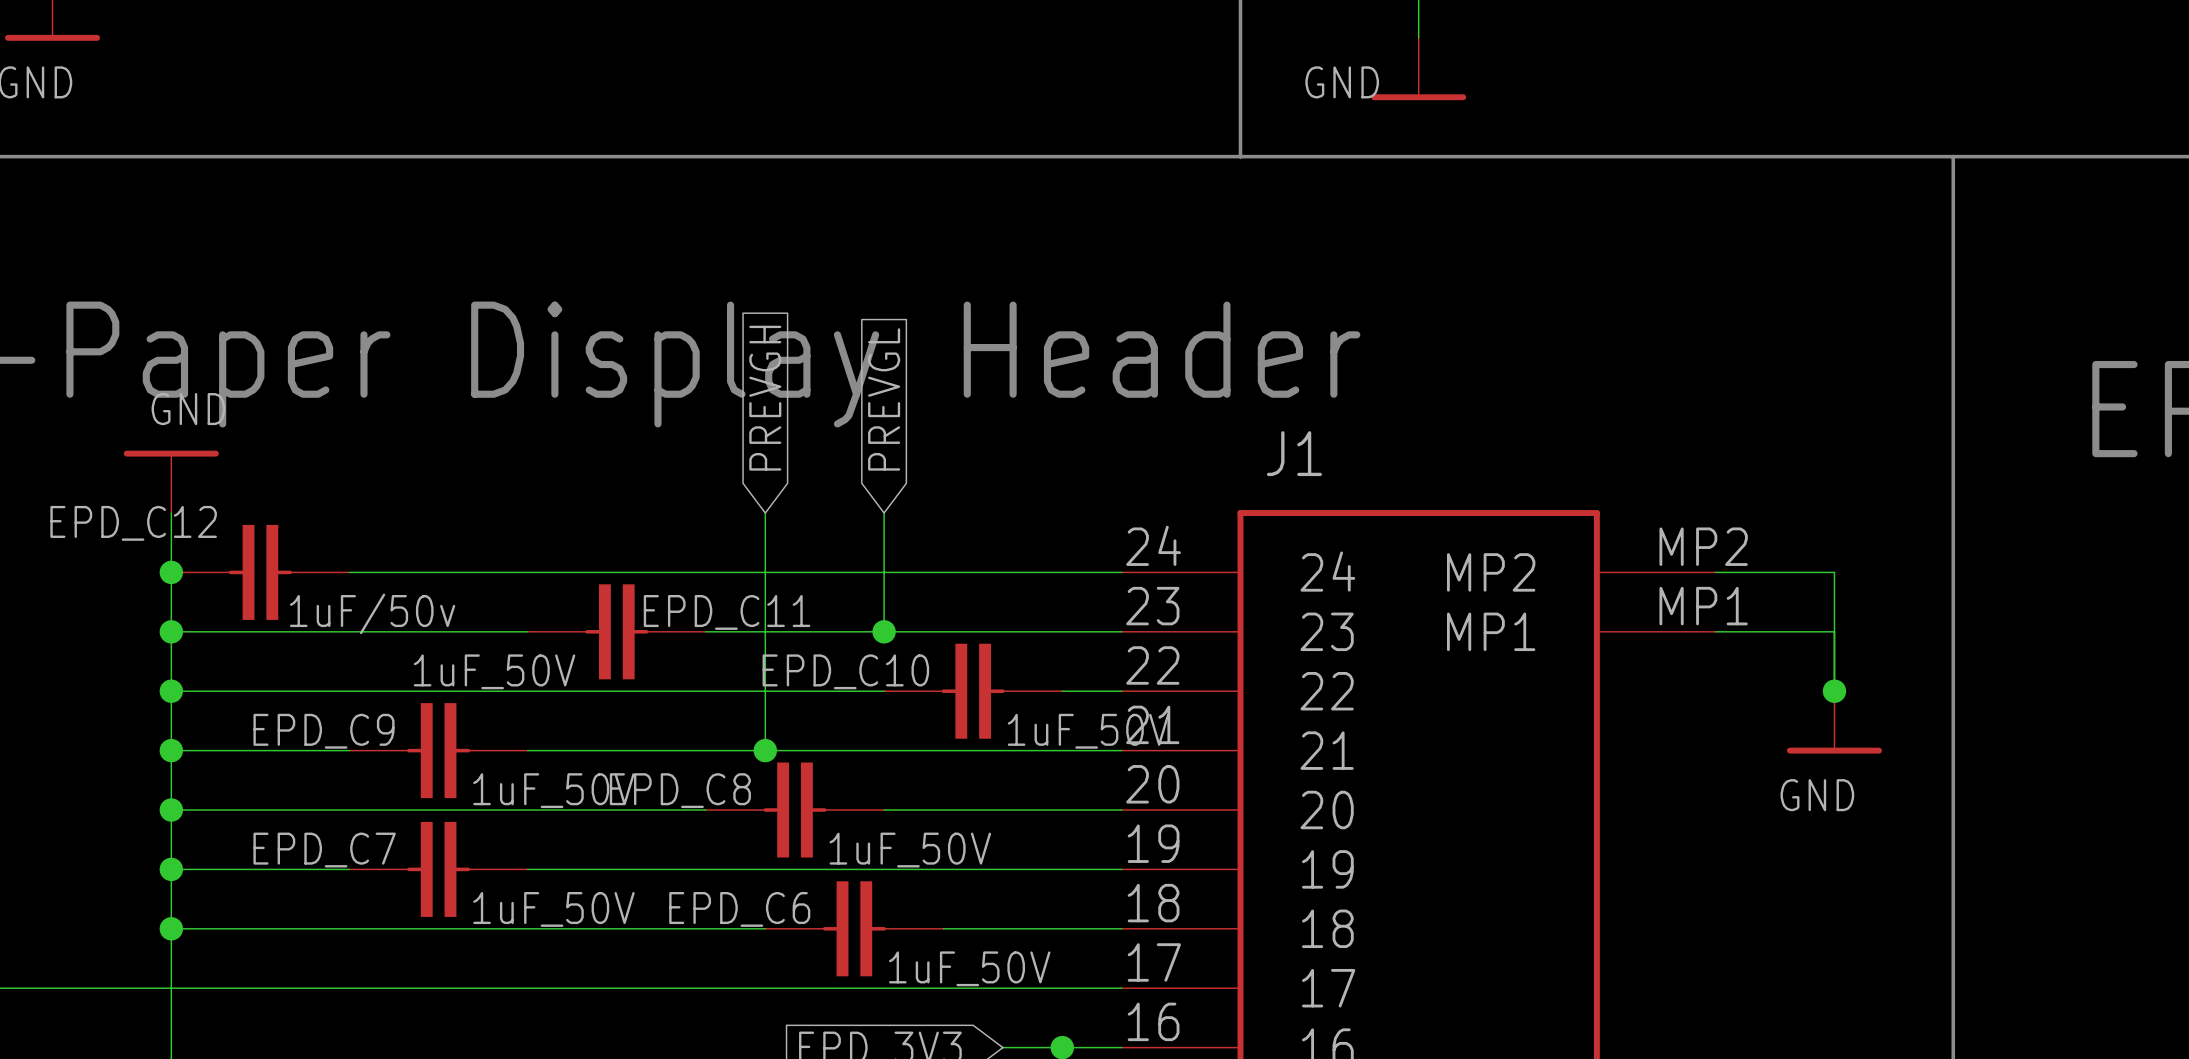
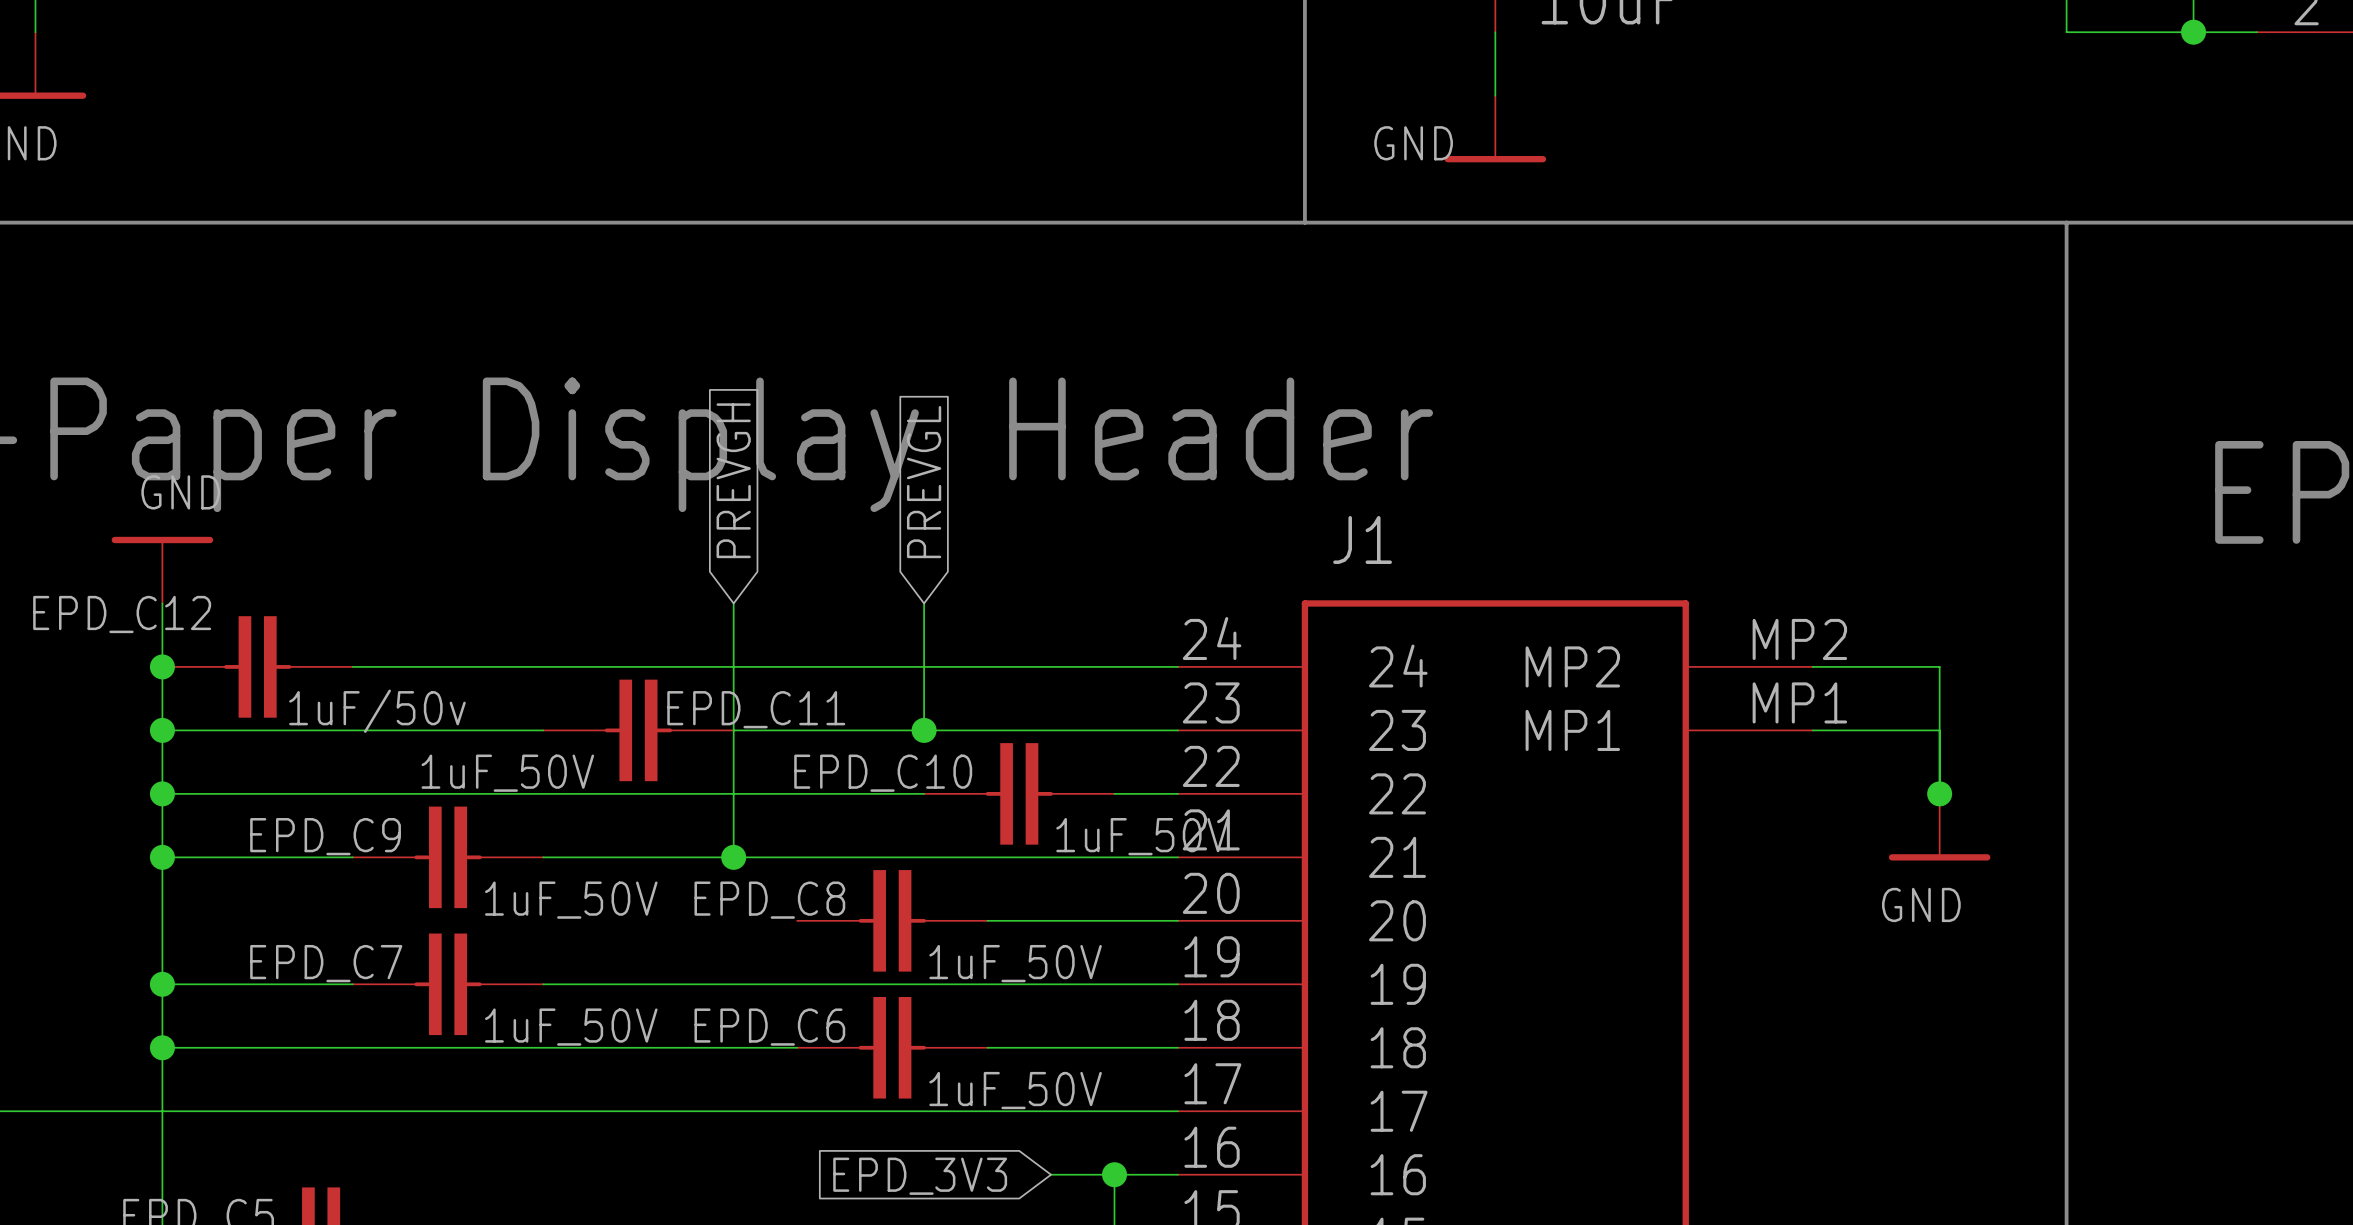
global label position: PREVGH (765, 398) -> PREVGH (733, 480)
wire: (765, 513) (765, 750) -> (733, 603) (733, 857)
junction position: (765, 750) -> (733, 857)
wire: (171, 810) (705, 810) -> none
junction: (171, 810) -> none
EPD_C8 position: (795, 810) -> (892, 920)

